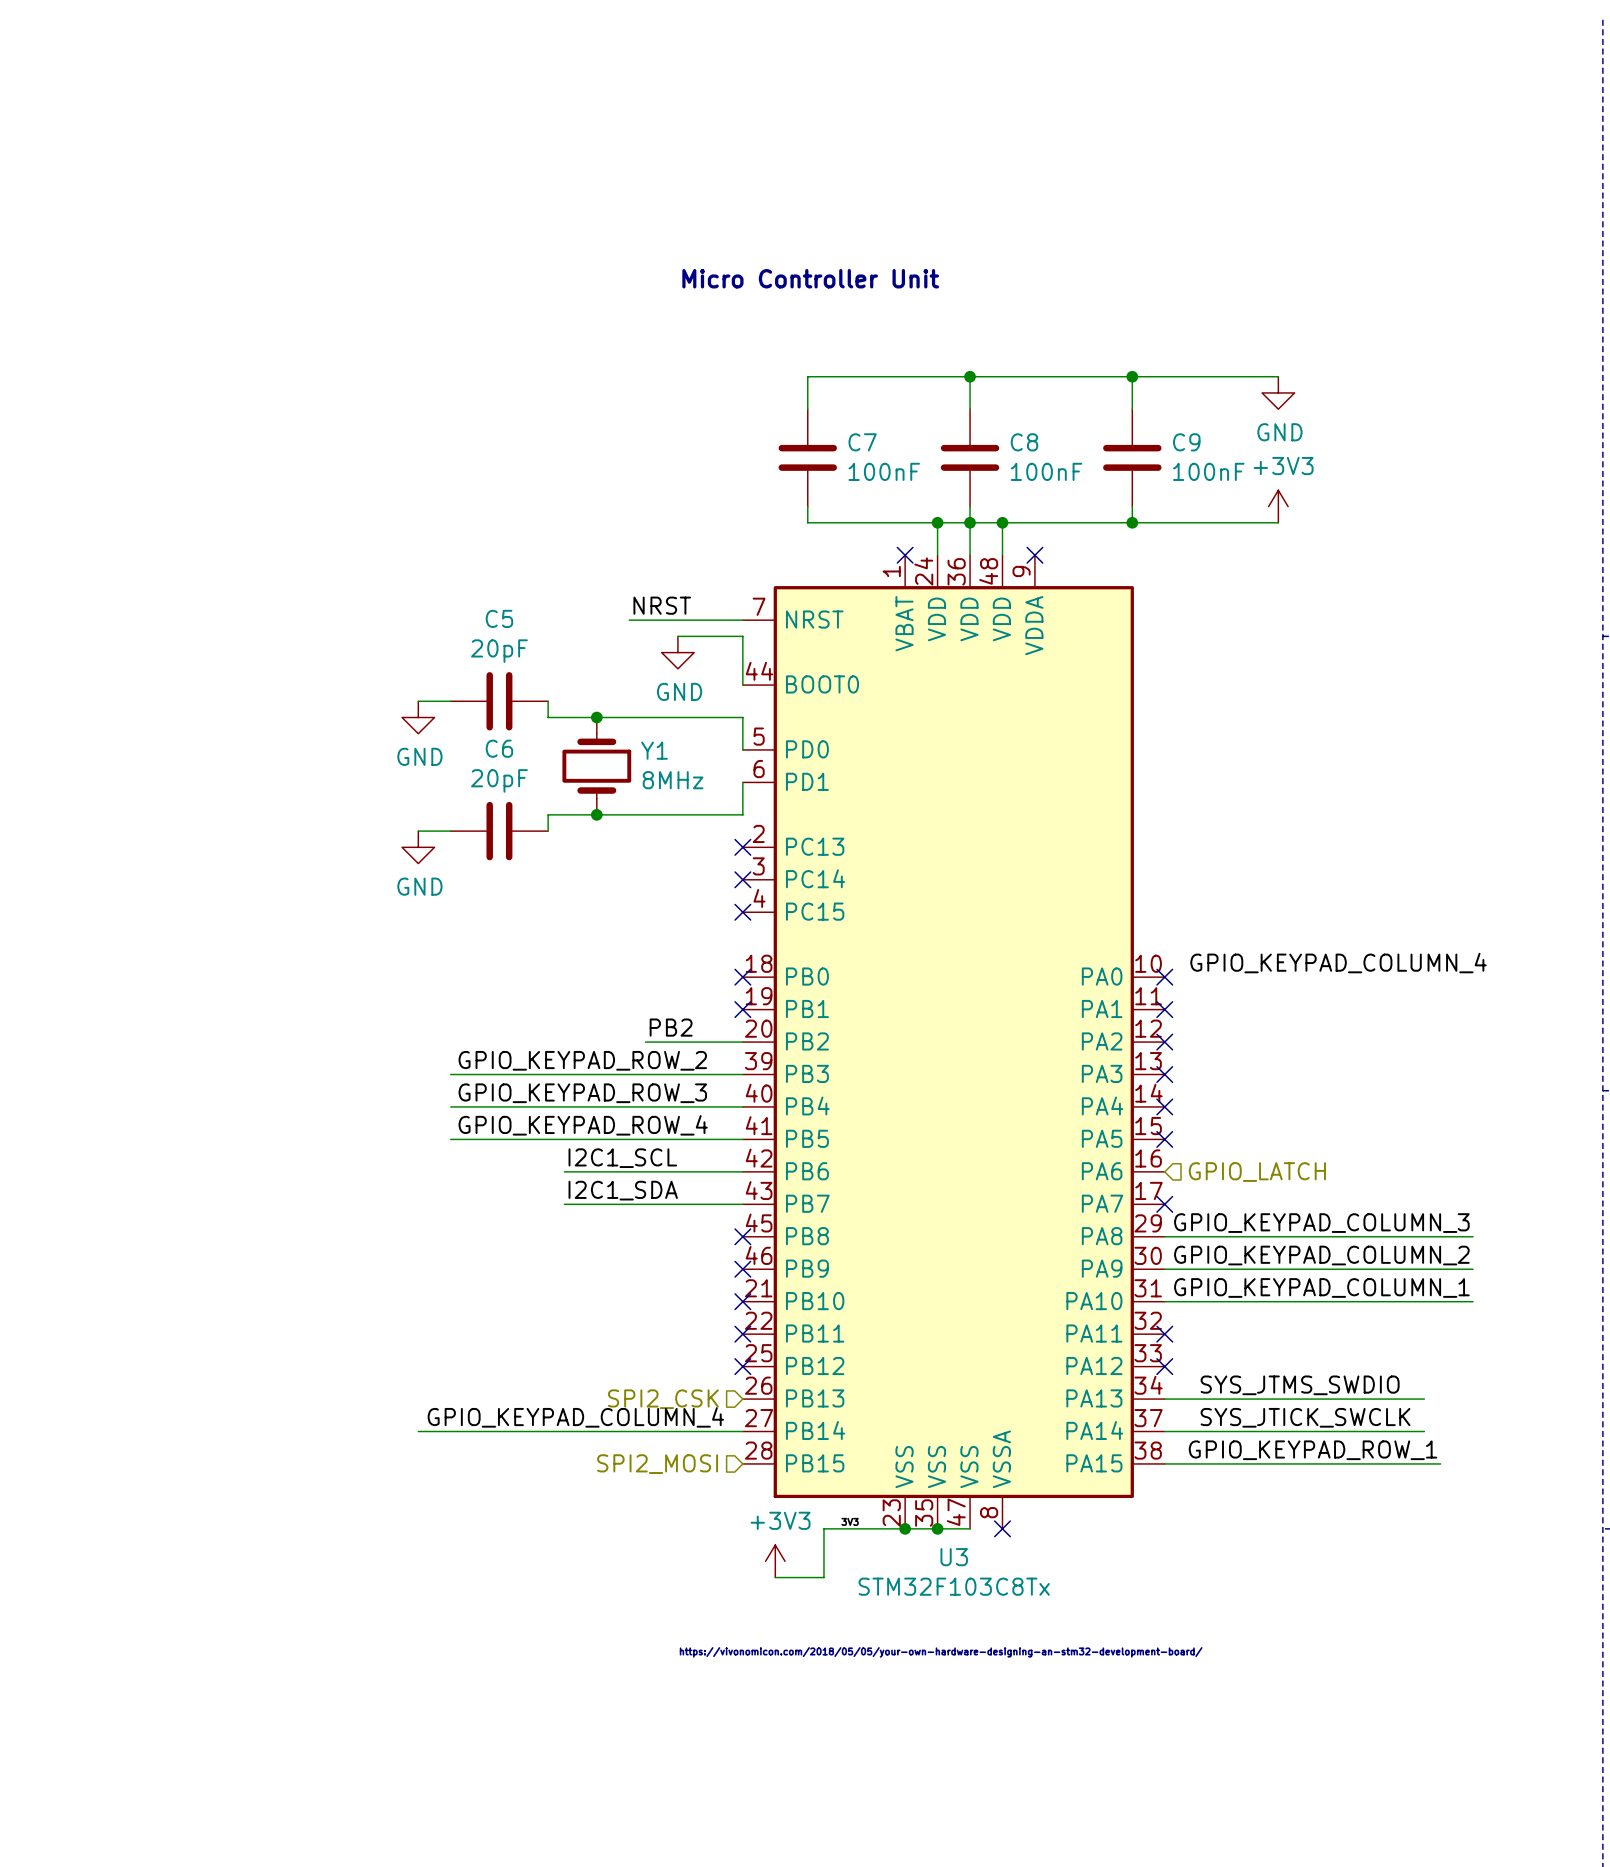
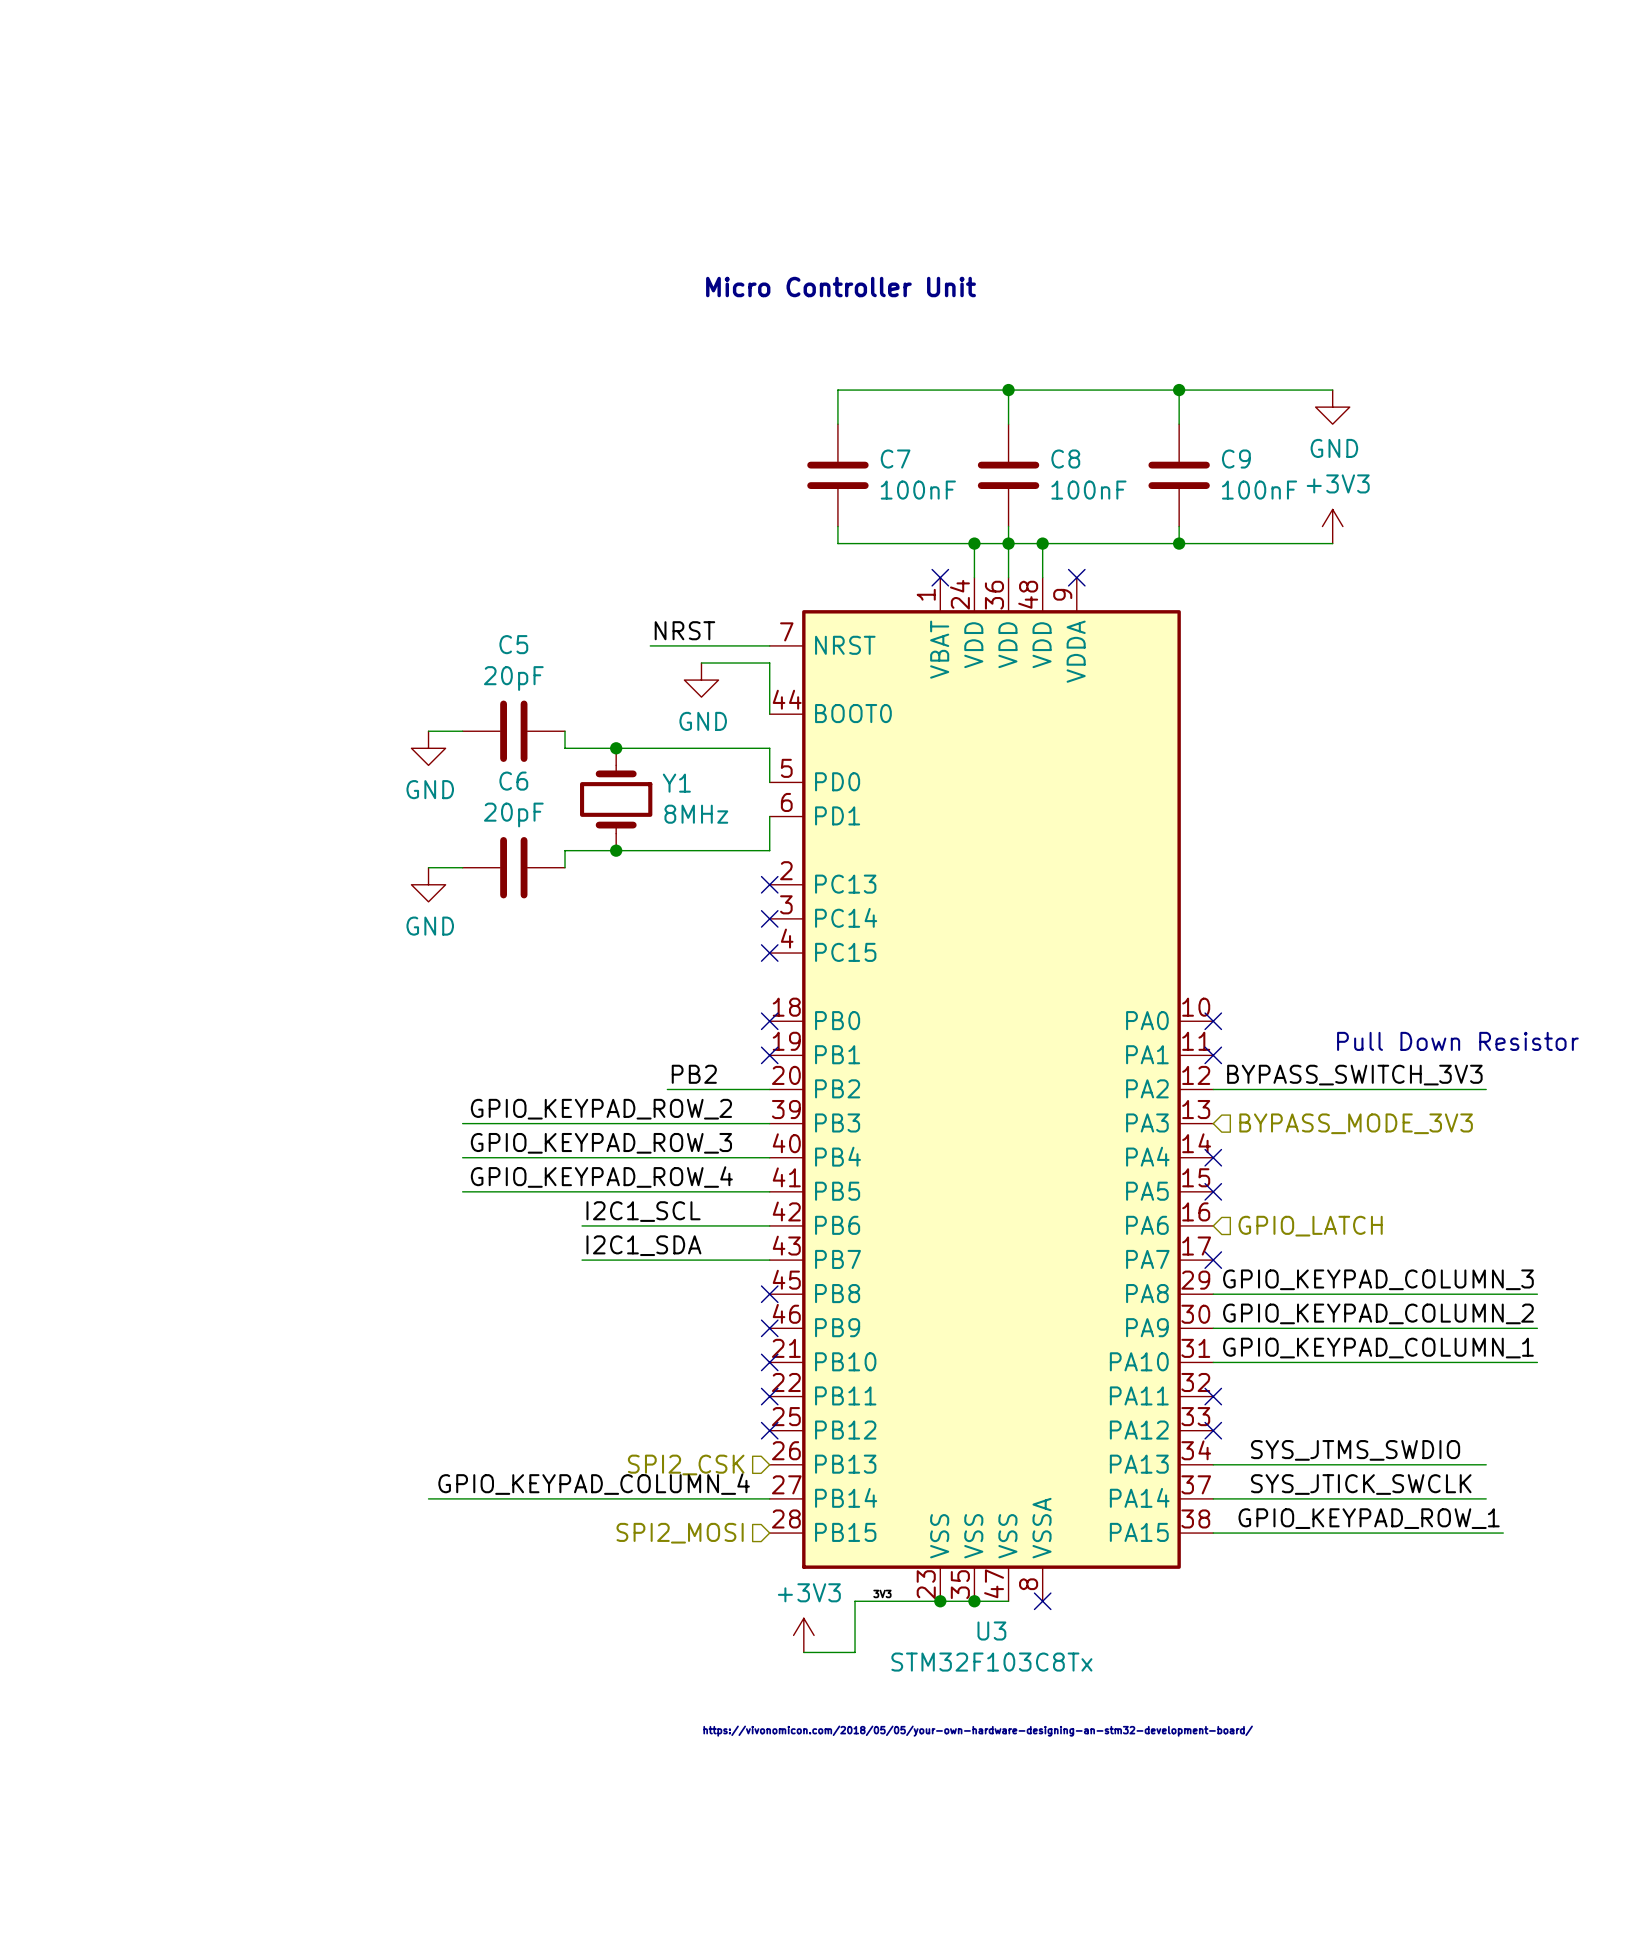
label: GPIO_KEYPAD_COLUMN_4 (1338, 963) -> none
text: none -> Pull Down Resistor (1457, 1041)
label: none -> BYPASS_SWITCH_3V3 (1354, 1075)
wire: none -> (1213, 1089) (1486, 1089)
no-connect mark: (1164, 1042) -> none
no-connect mark: (1164, 1074) -> none
hierarchical label: none -> BYPASS_MODE_3V3 (1356, 1123)

